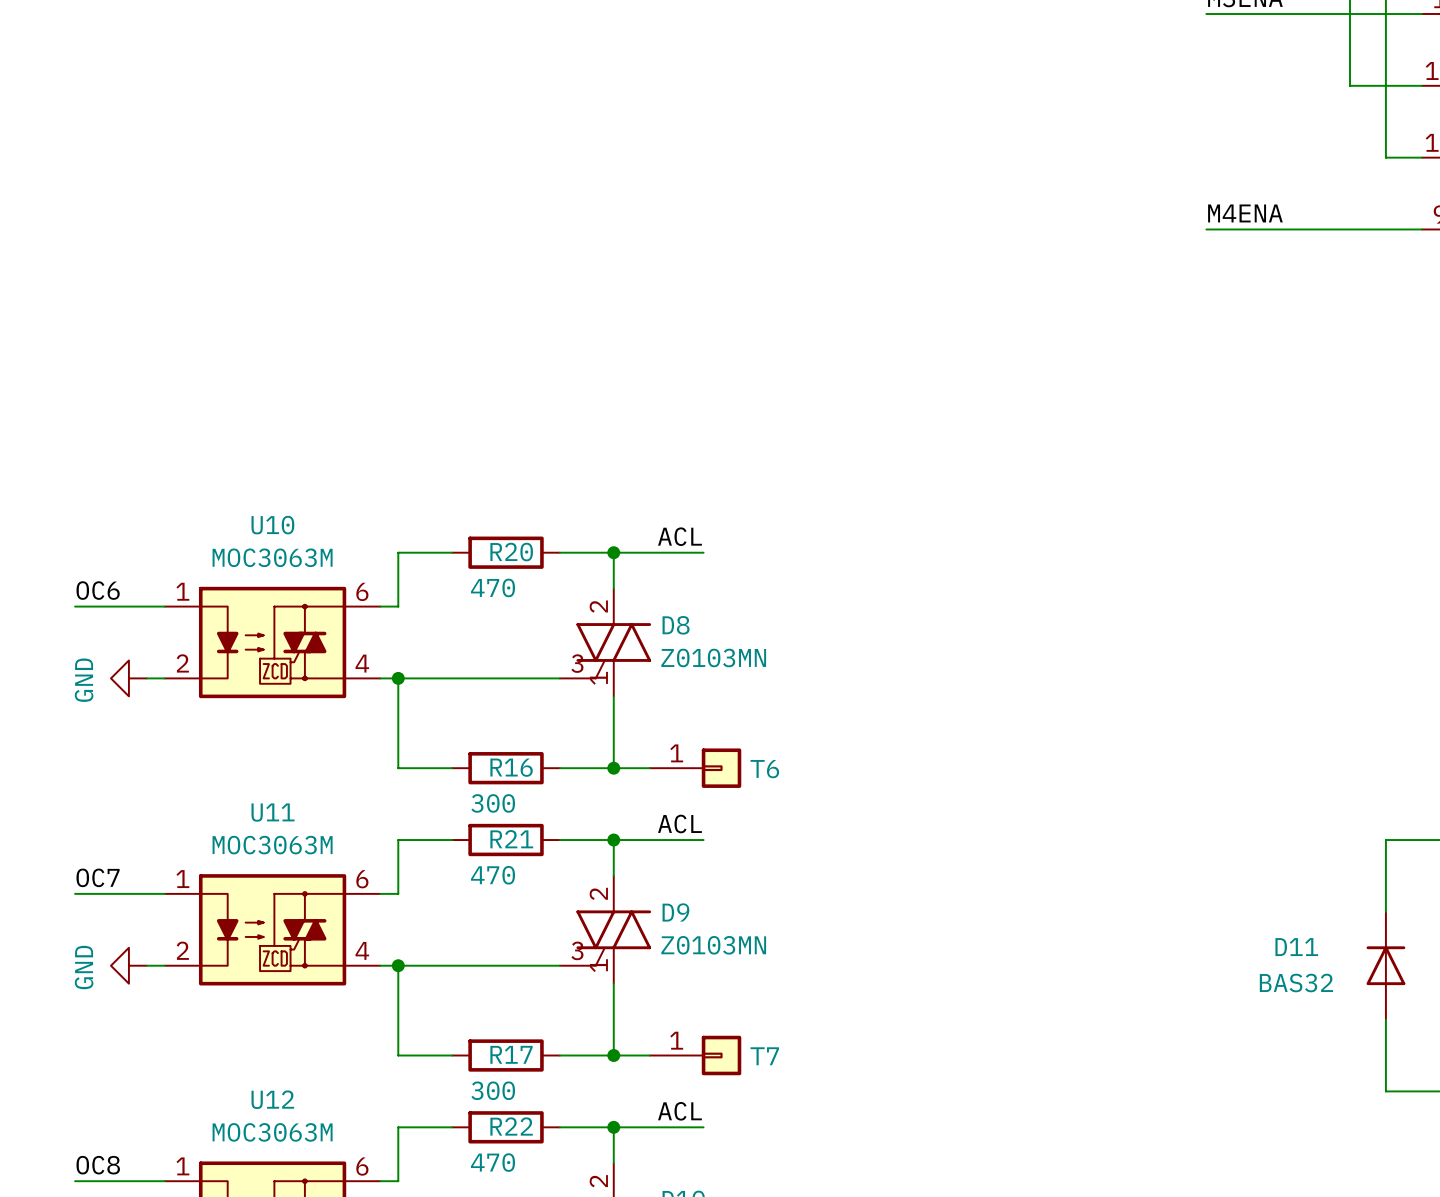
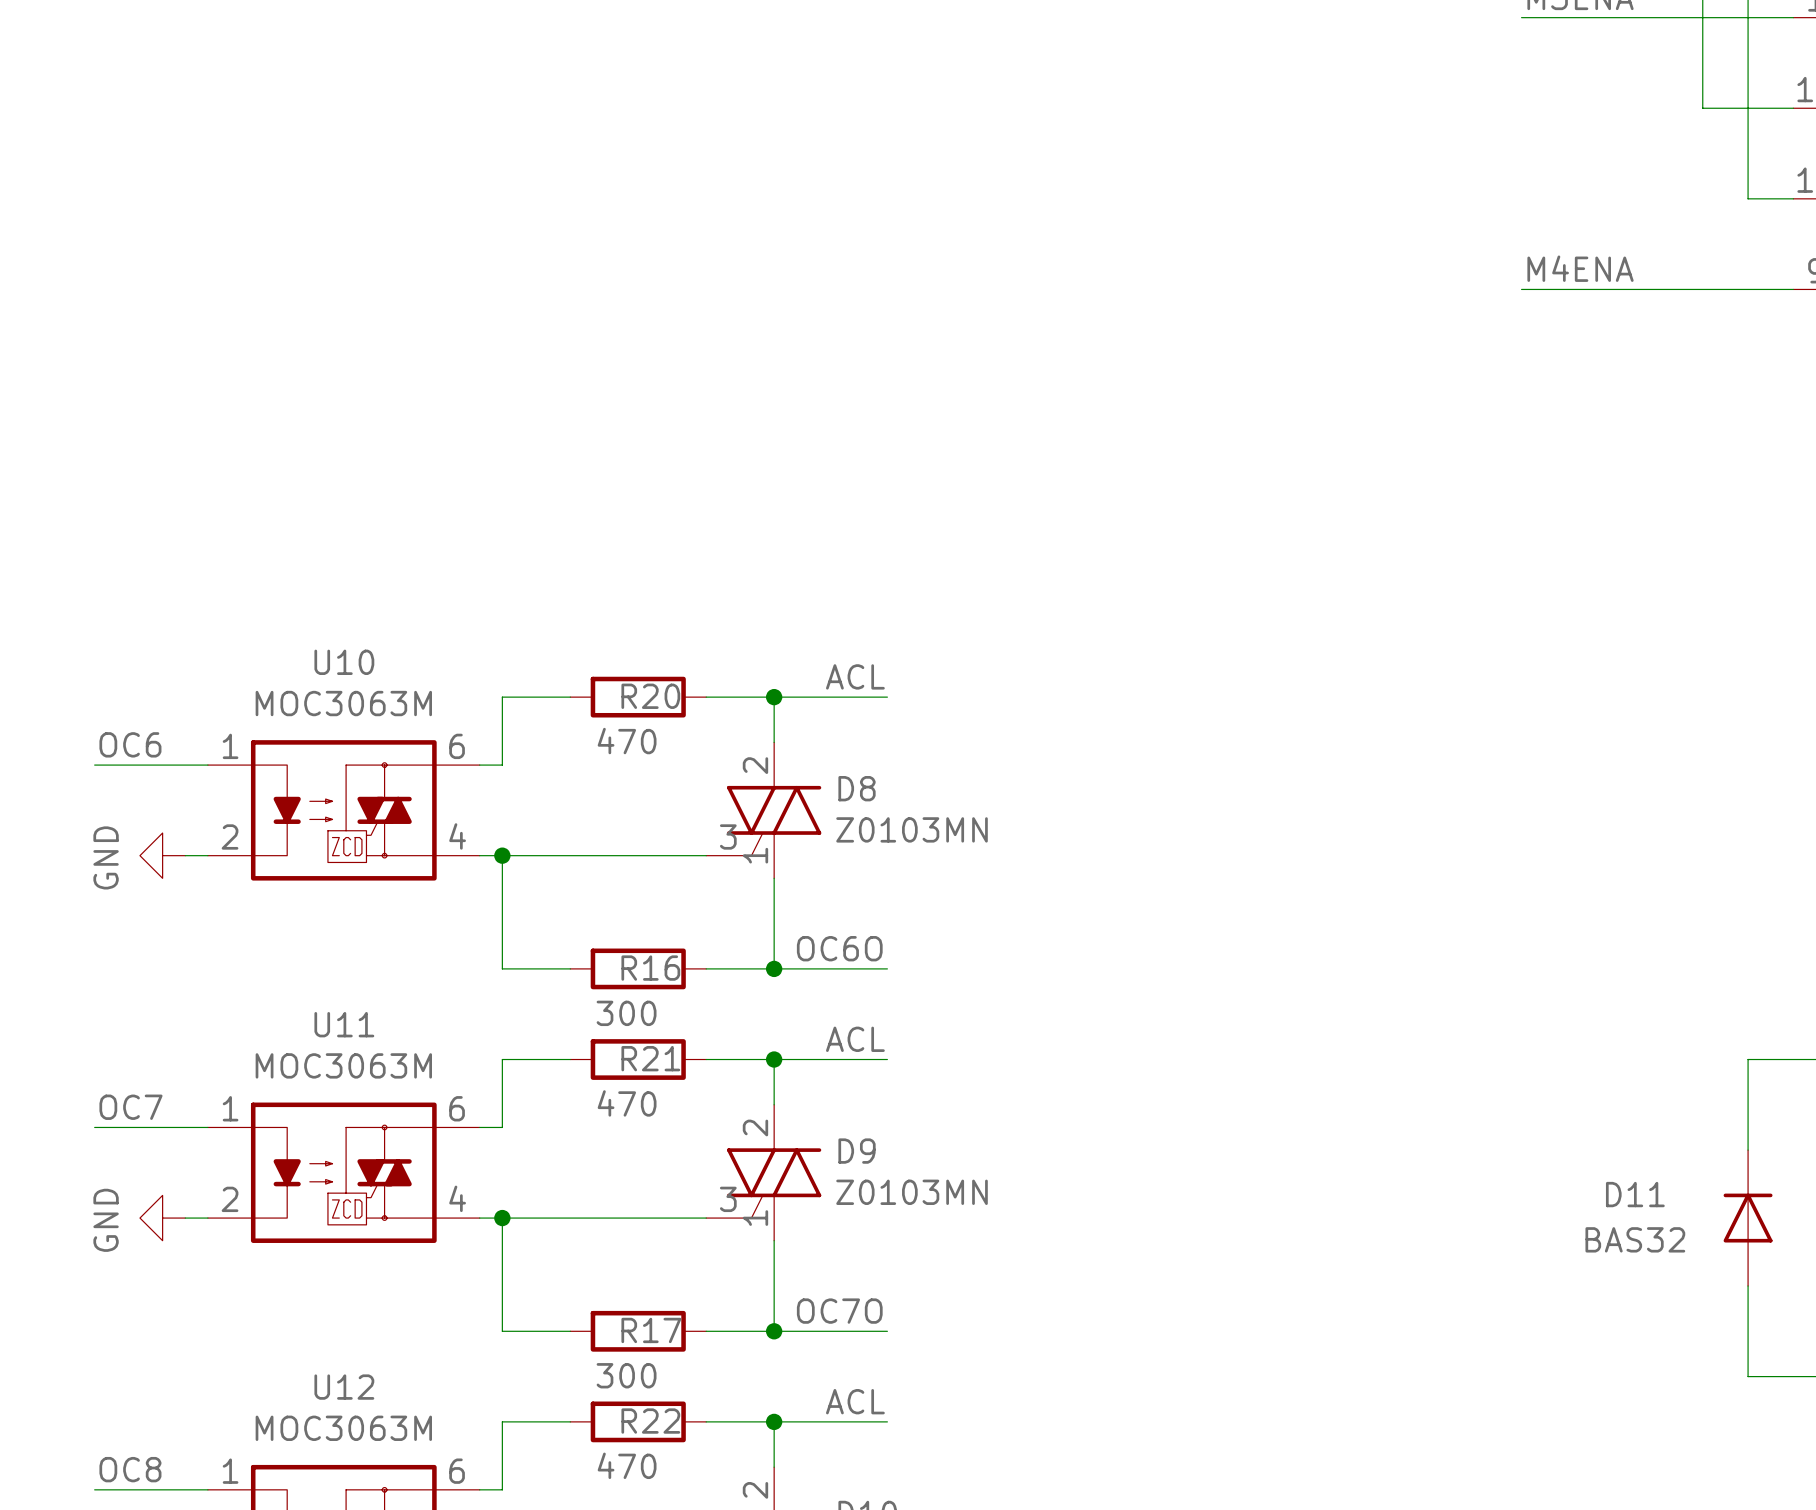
label: none -> OC6O (839, 948)
T6: (695, 768) -> none
label: none -> OC7O (839, 1311)
T7: (695, 1055) -> none

